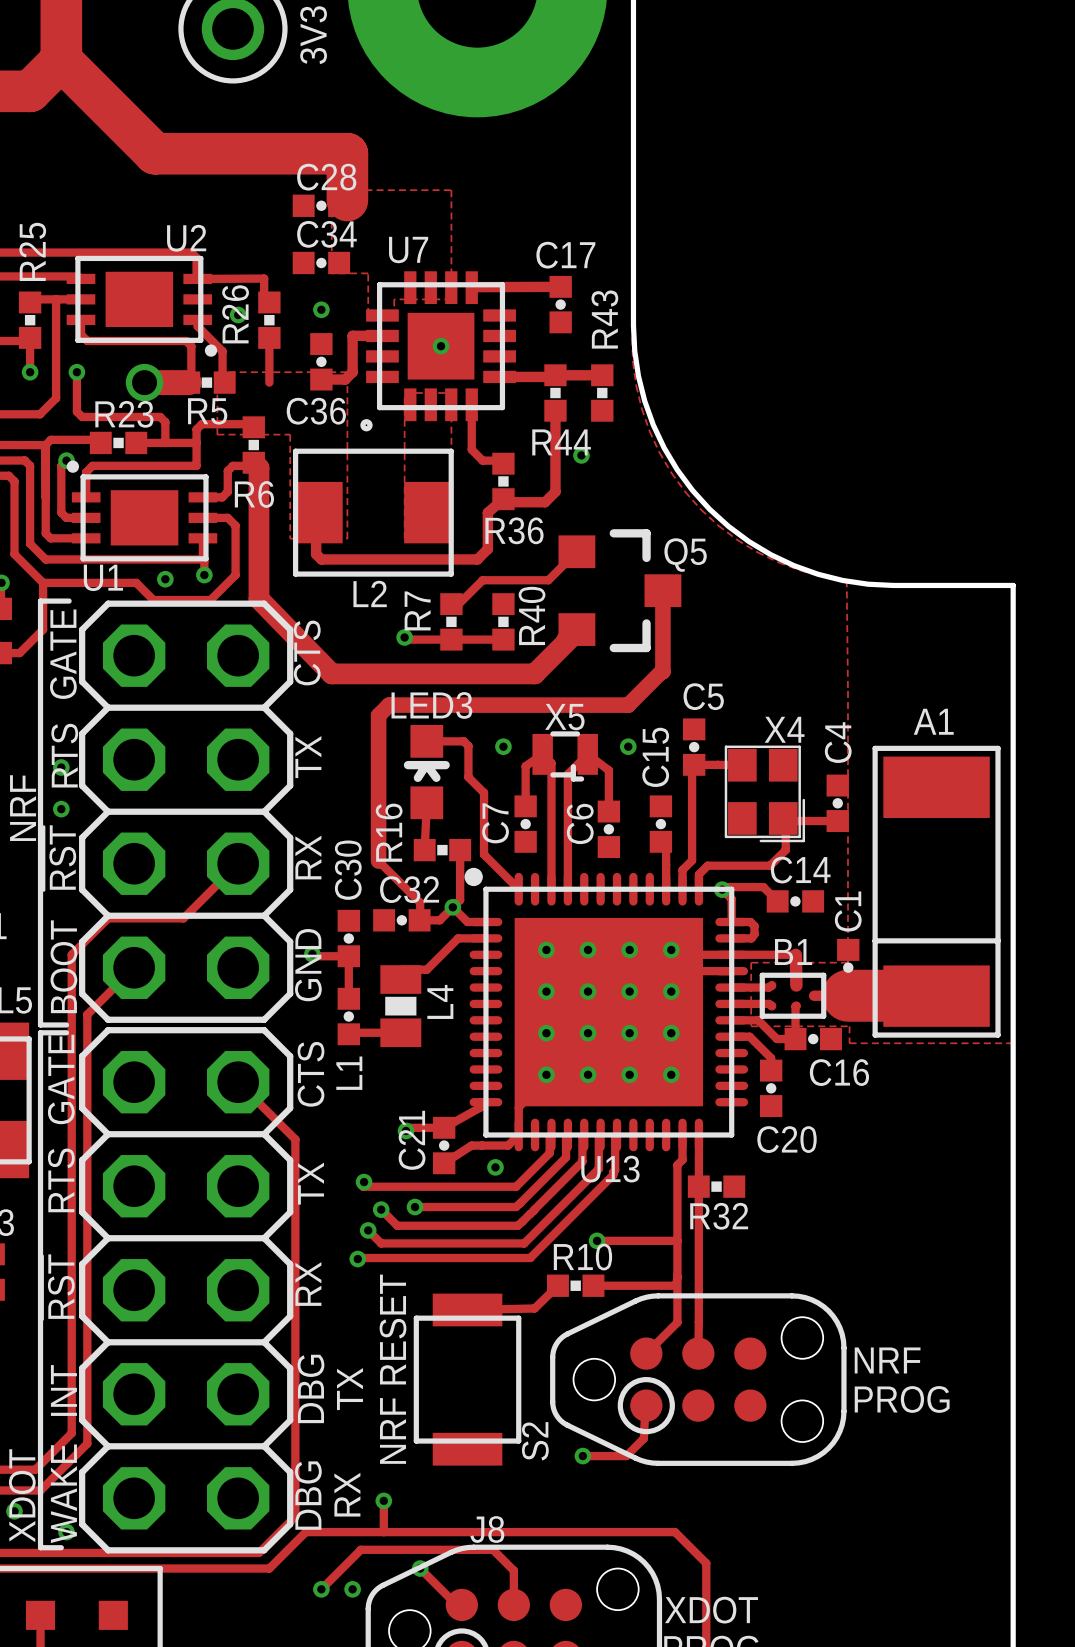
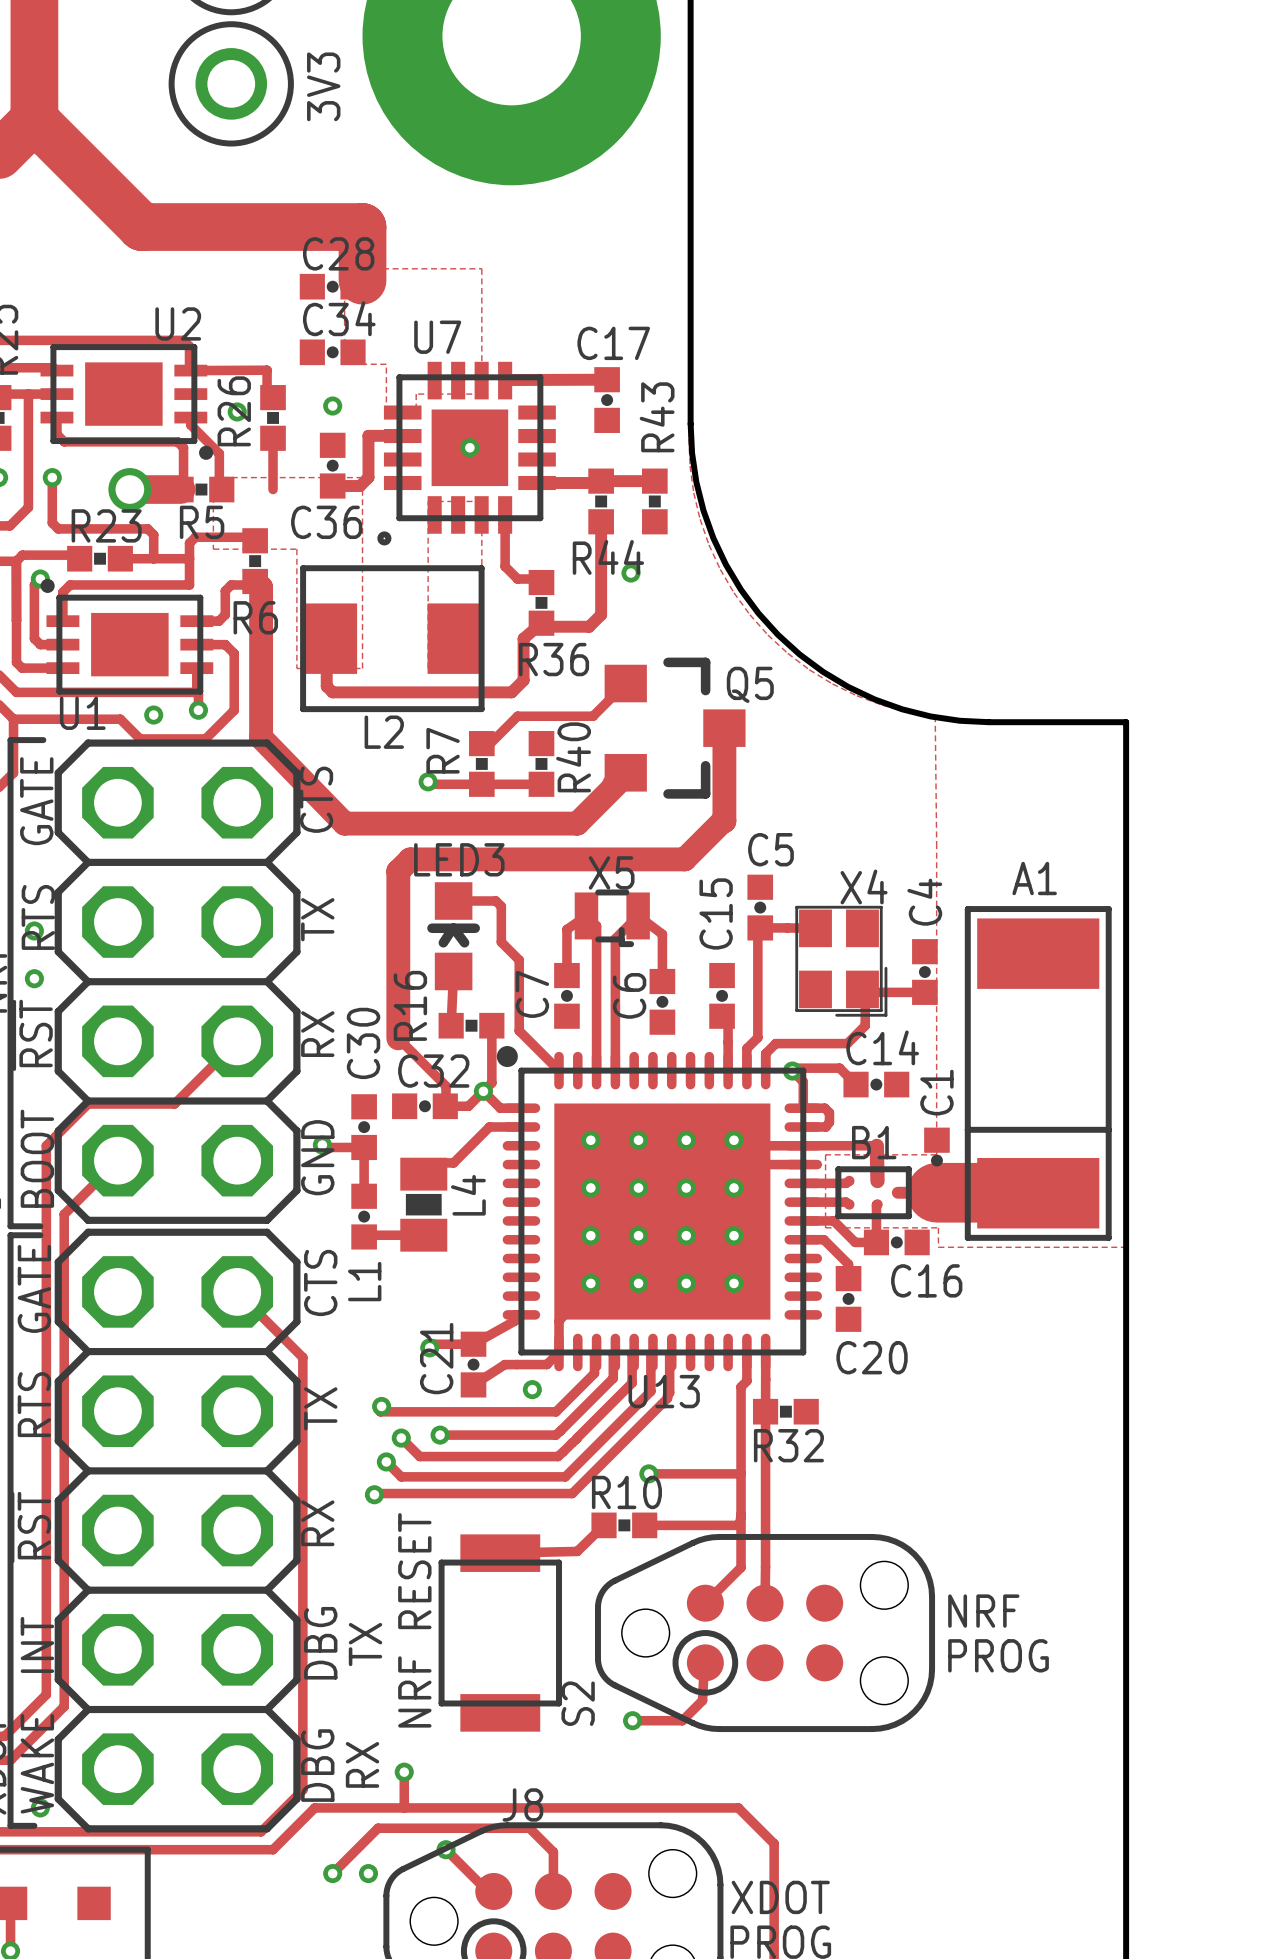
track width: thin (662, 590) (662, 671) (628, 705) (389, 705) (378, 715) (378, 861) -> thick (724, 728) (724, 821) (684, 859) (410, 859) (398, 871) (398, 1038)
via: (503, 746) -> none
via: (628, 746) -> none

